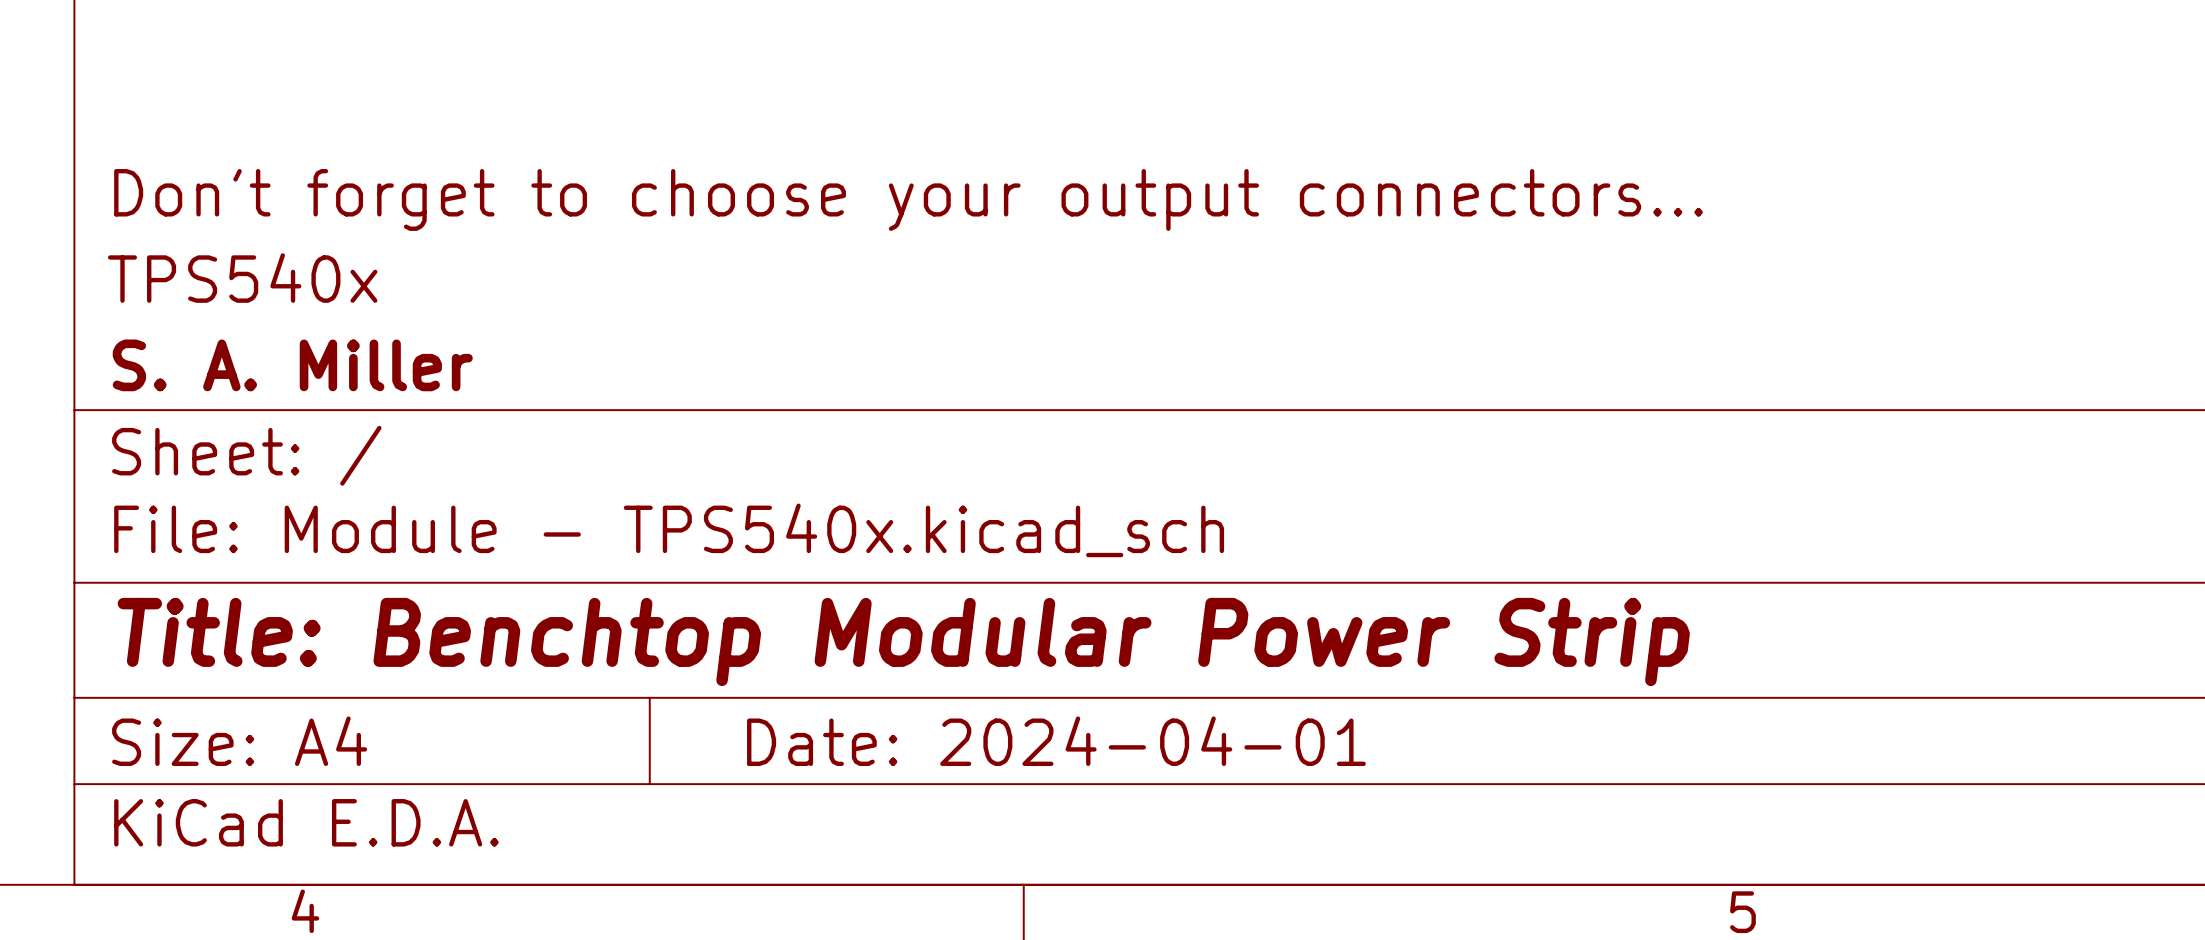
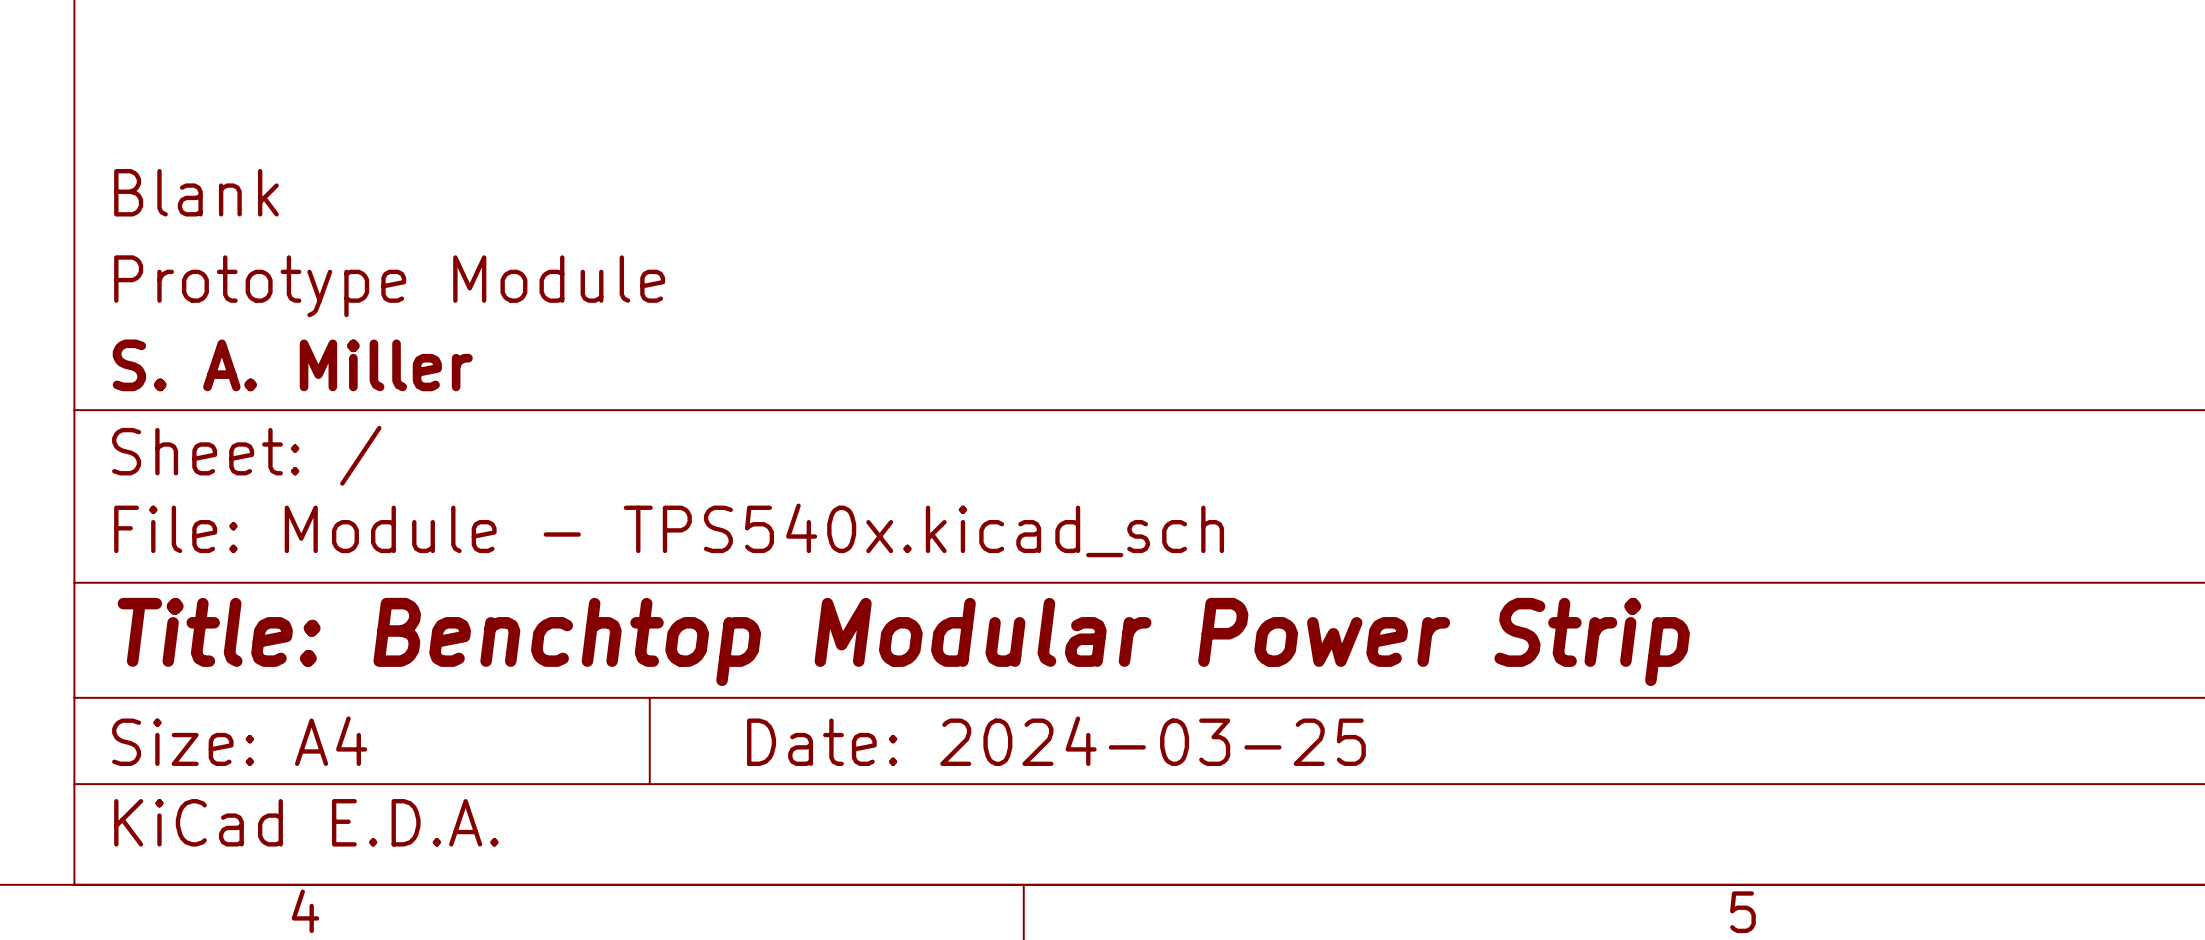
title block: Don't forget to choose your output connectors... (908, 199) -> Blank (196, 192)
title block: TPS540x (242, 278) -> Prototype Module (389, 286)
title block: Date: 2024-04-01 (1056, 741) -> Date: 2024-03-25 (1056, 741)

